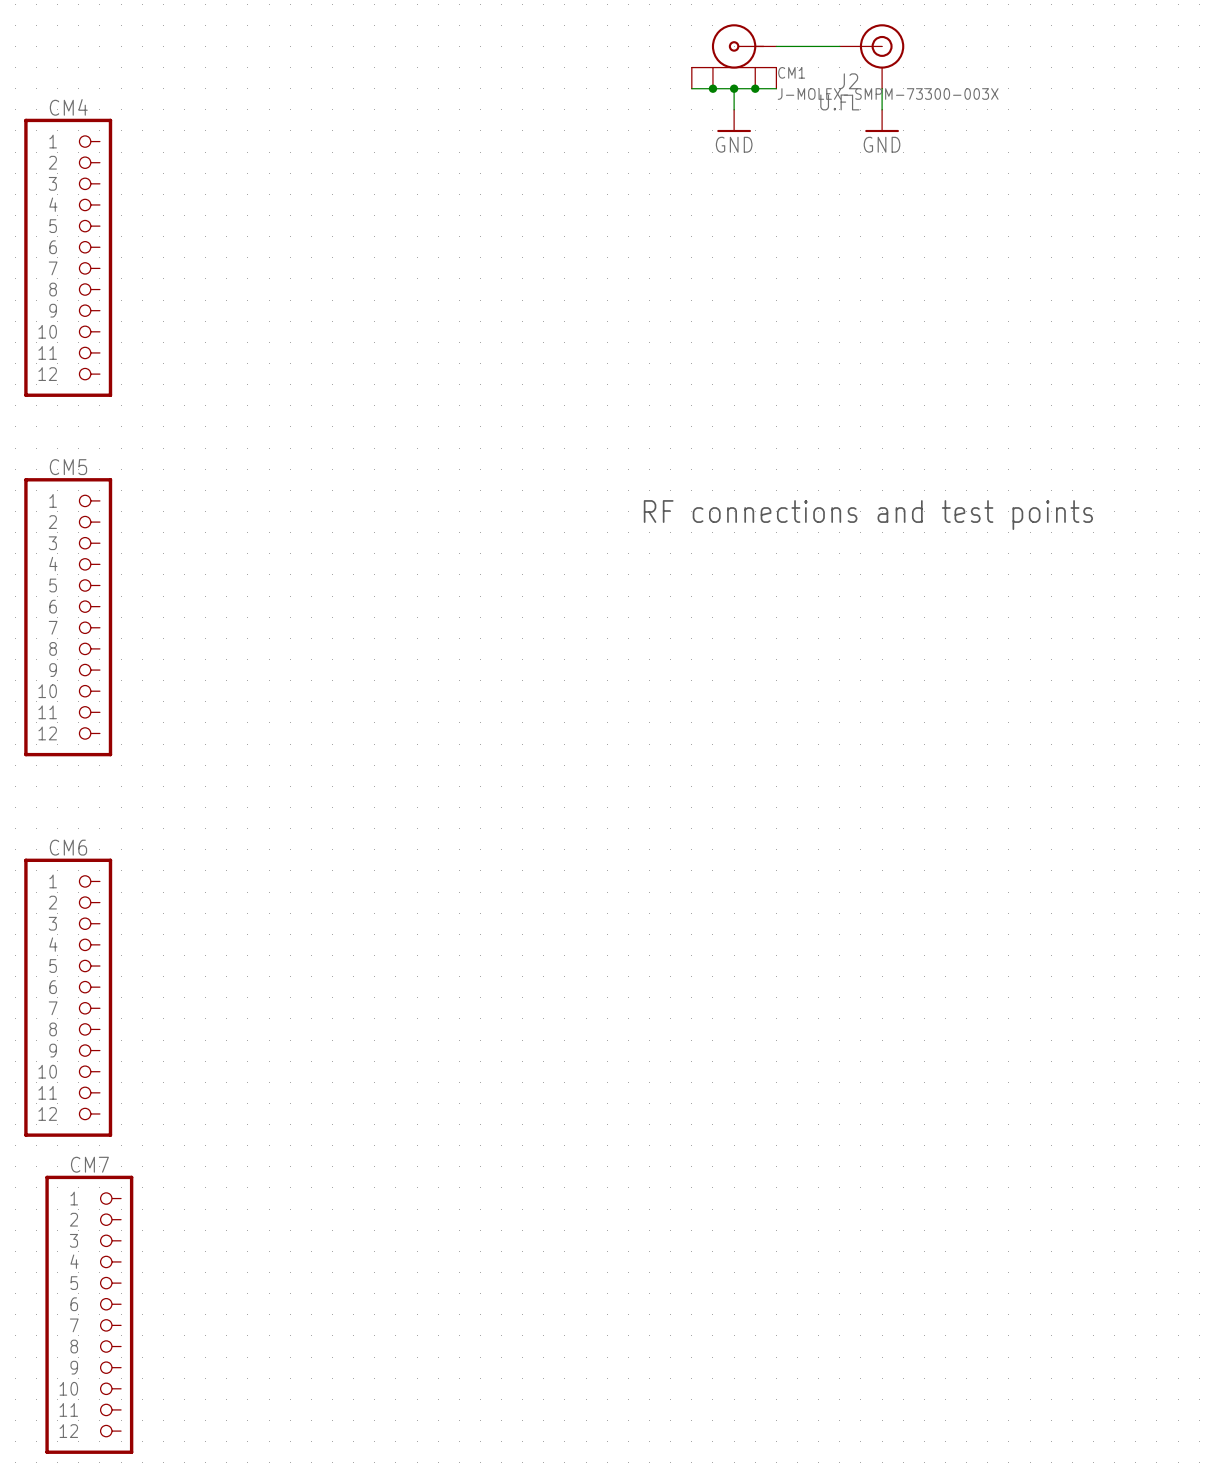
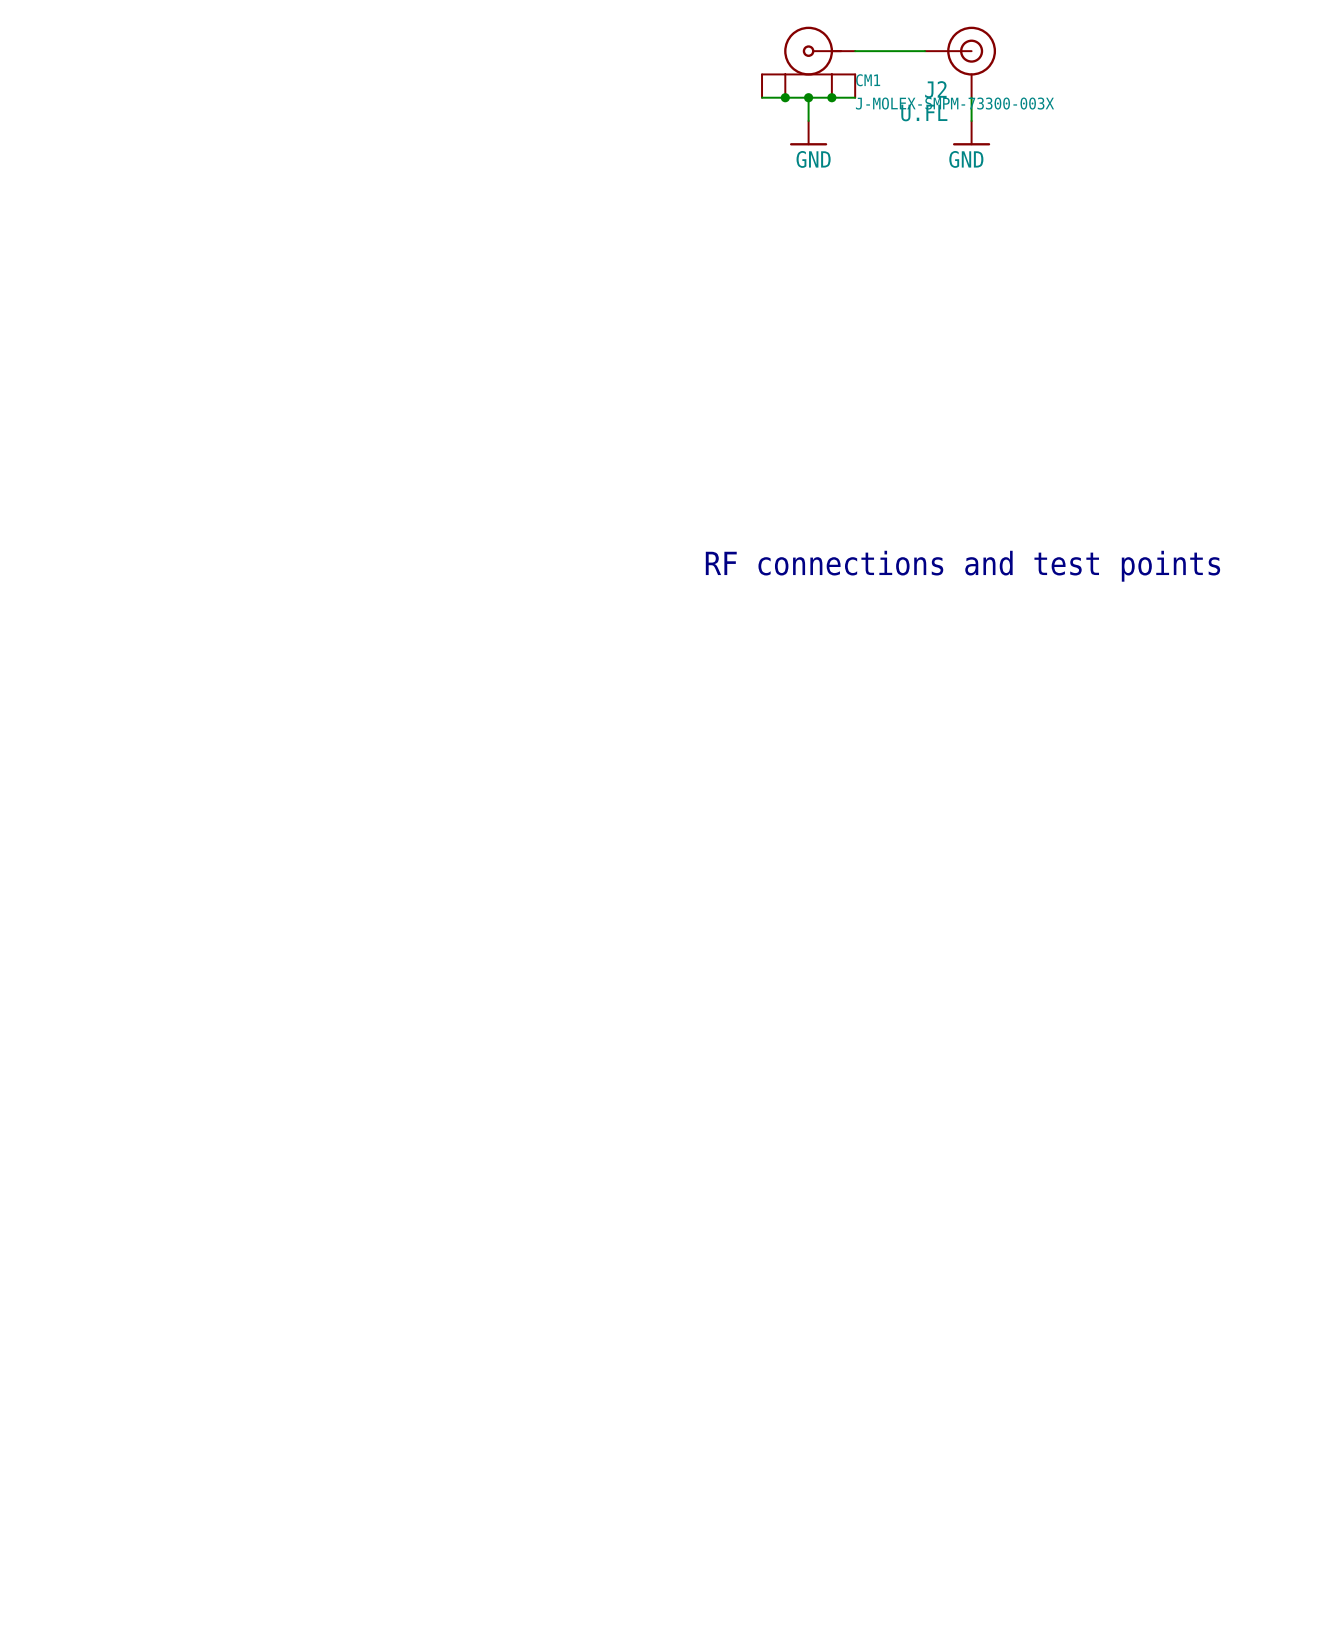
CM4: (68, 257) -> none
CM5: (68, 617) -> none
CM6: (68, 997) -> none
CM7: (89, 1314) -> none

